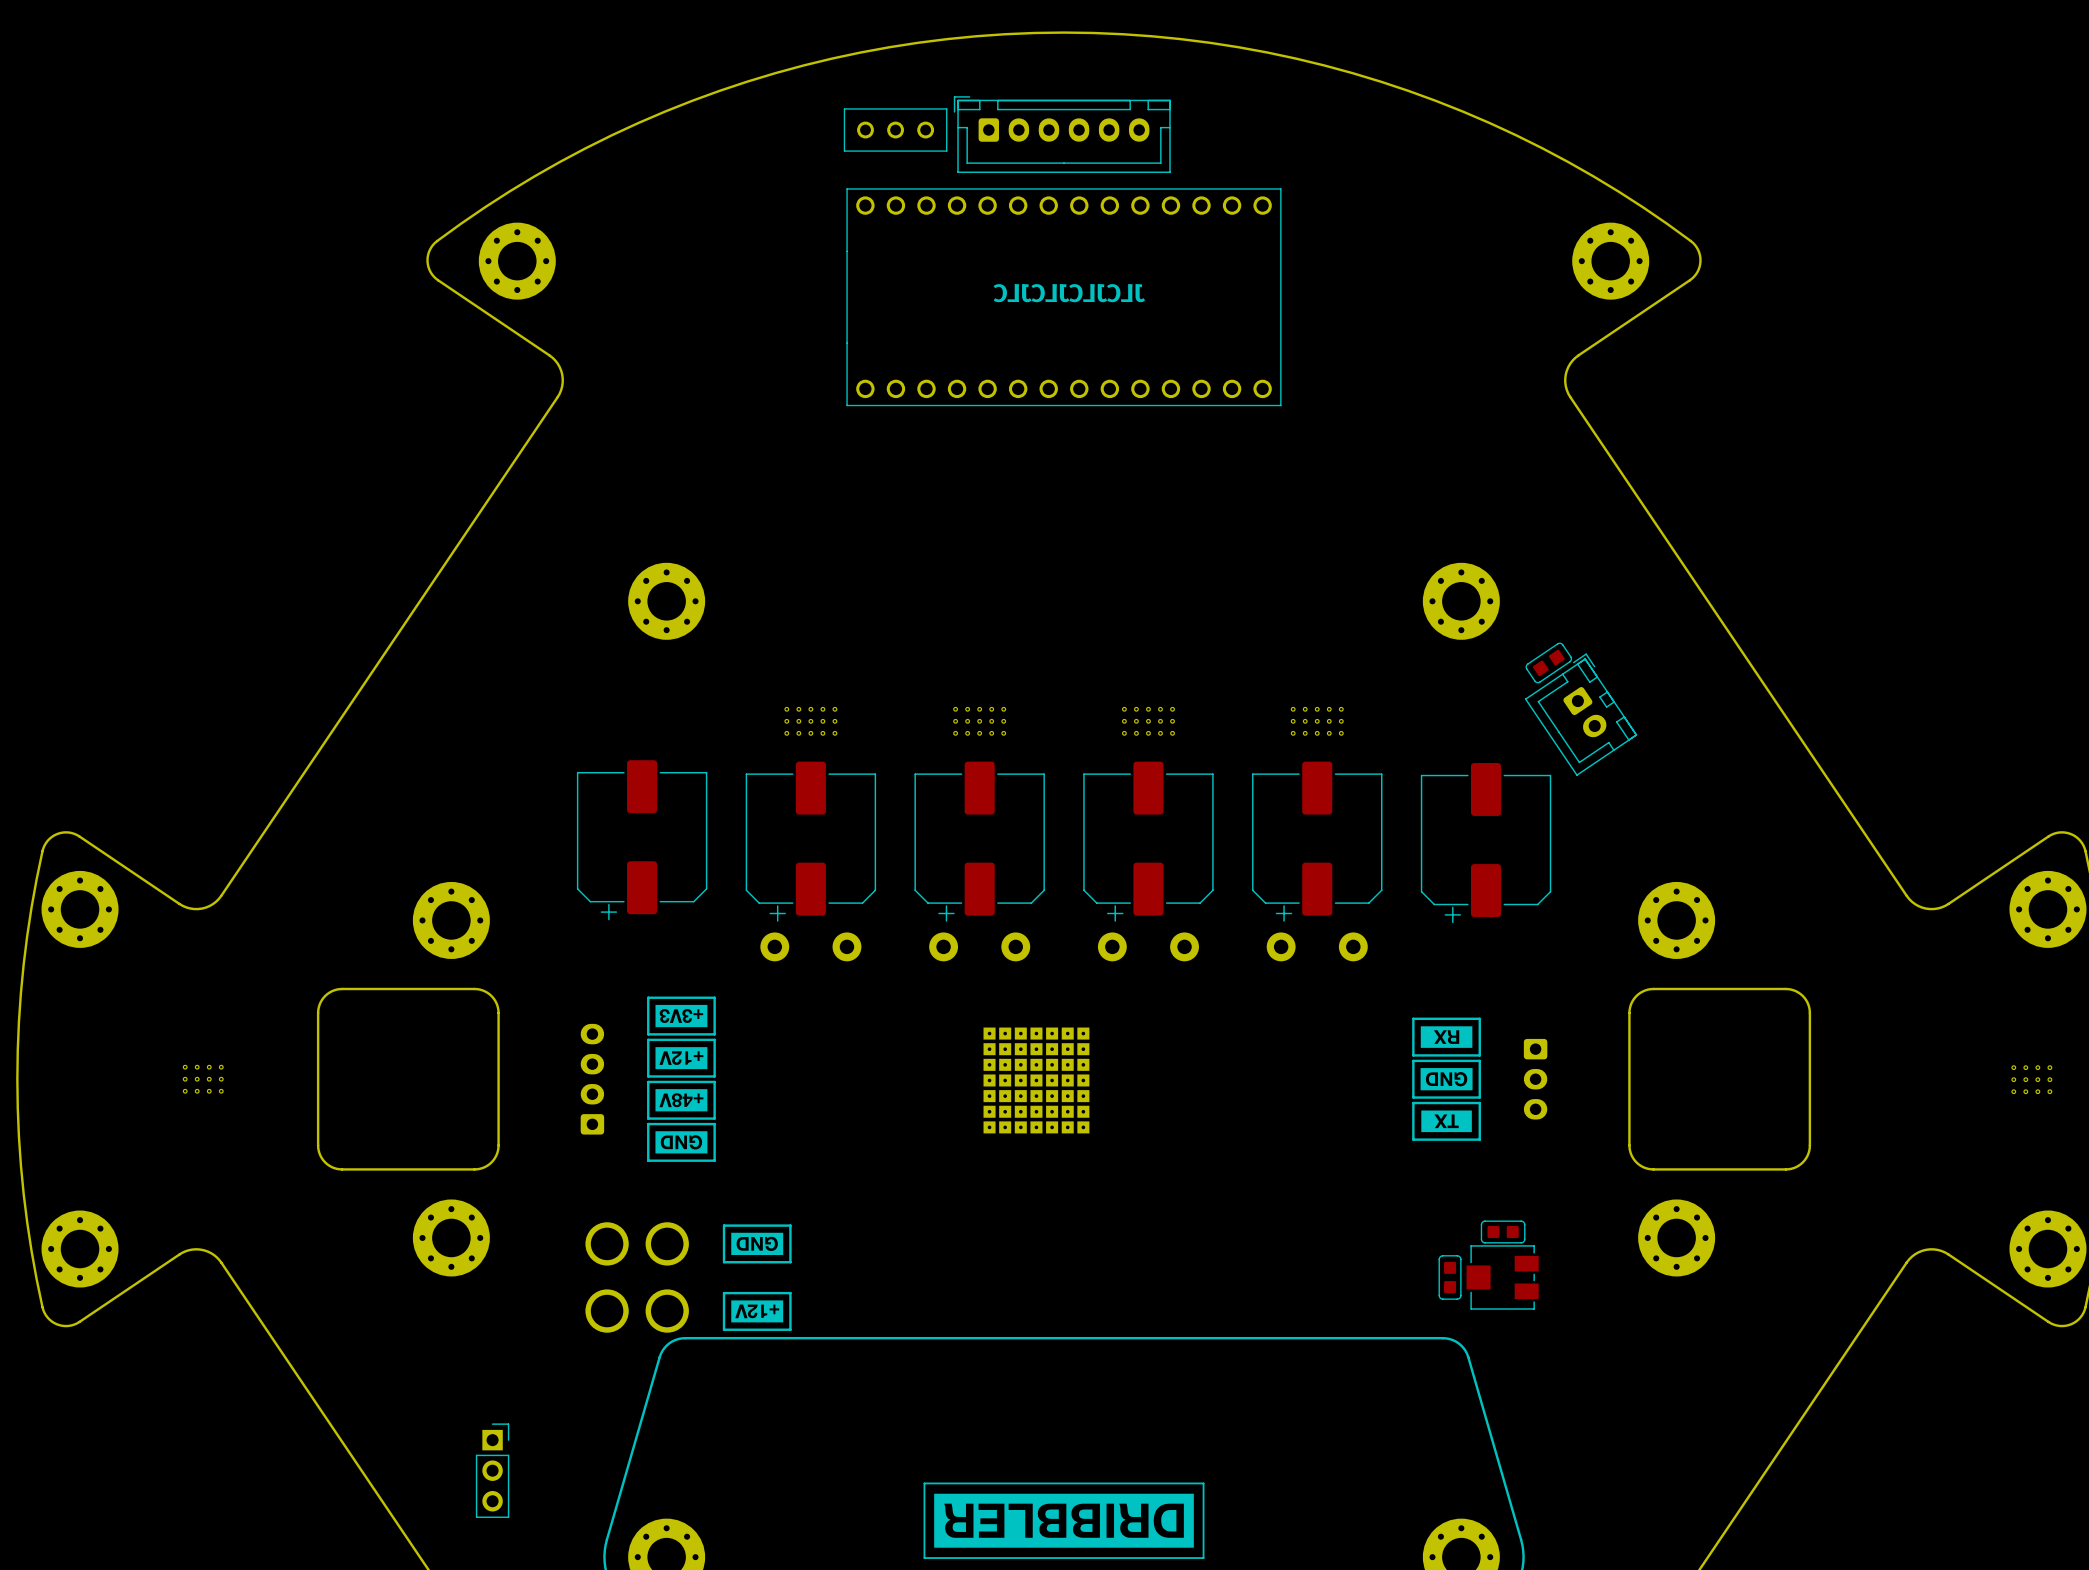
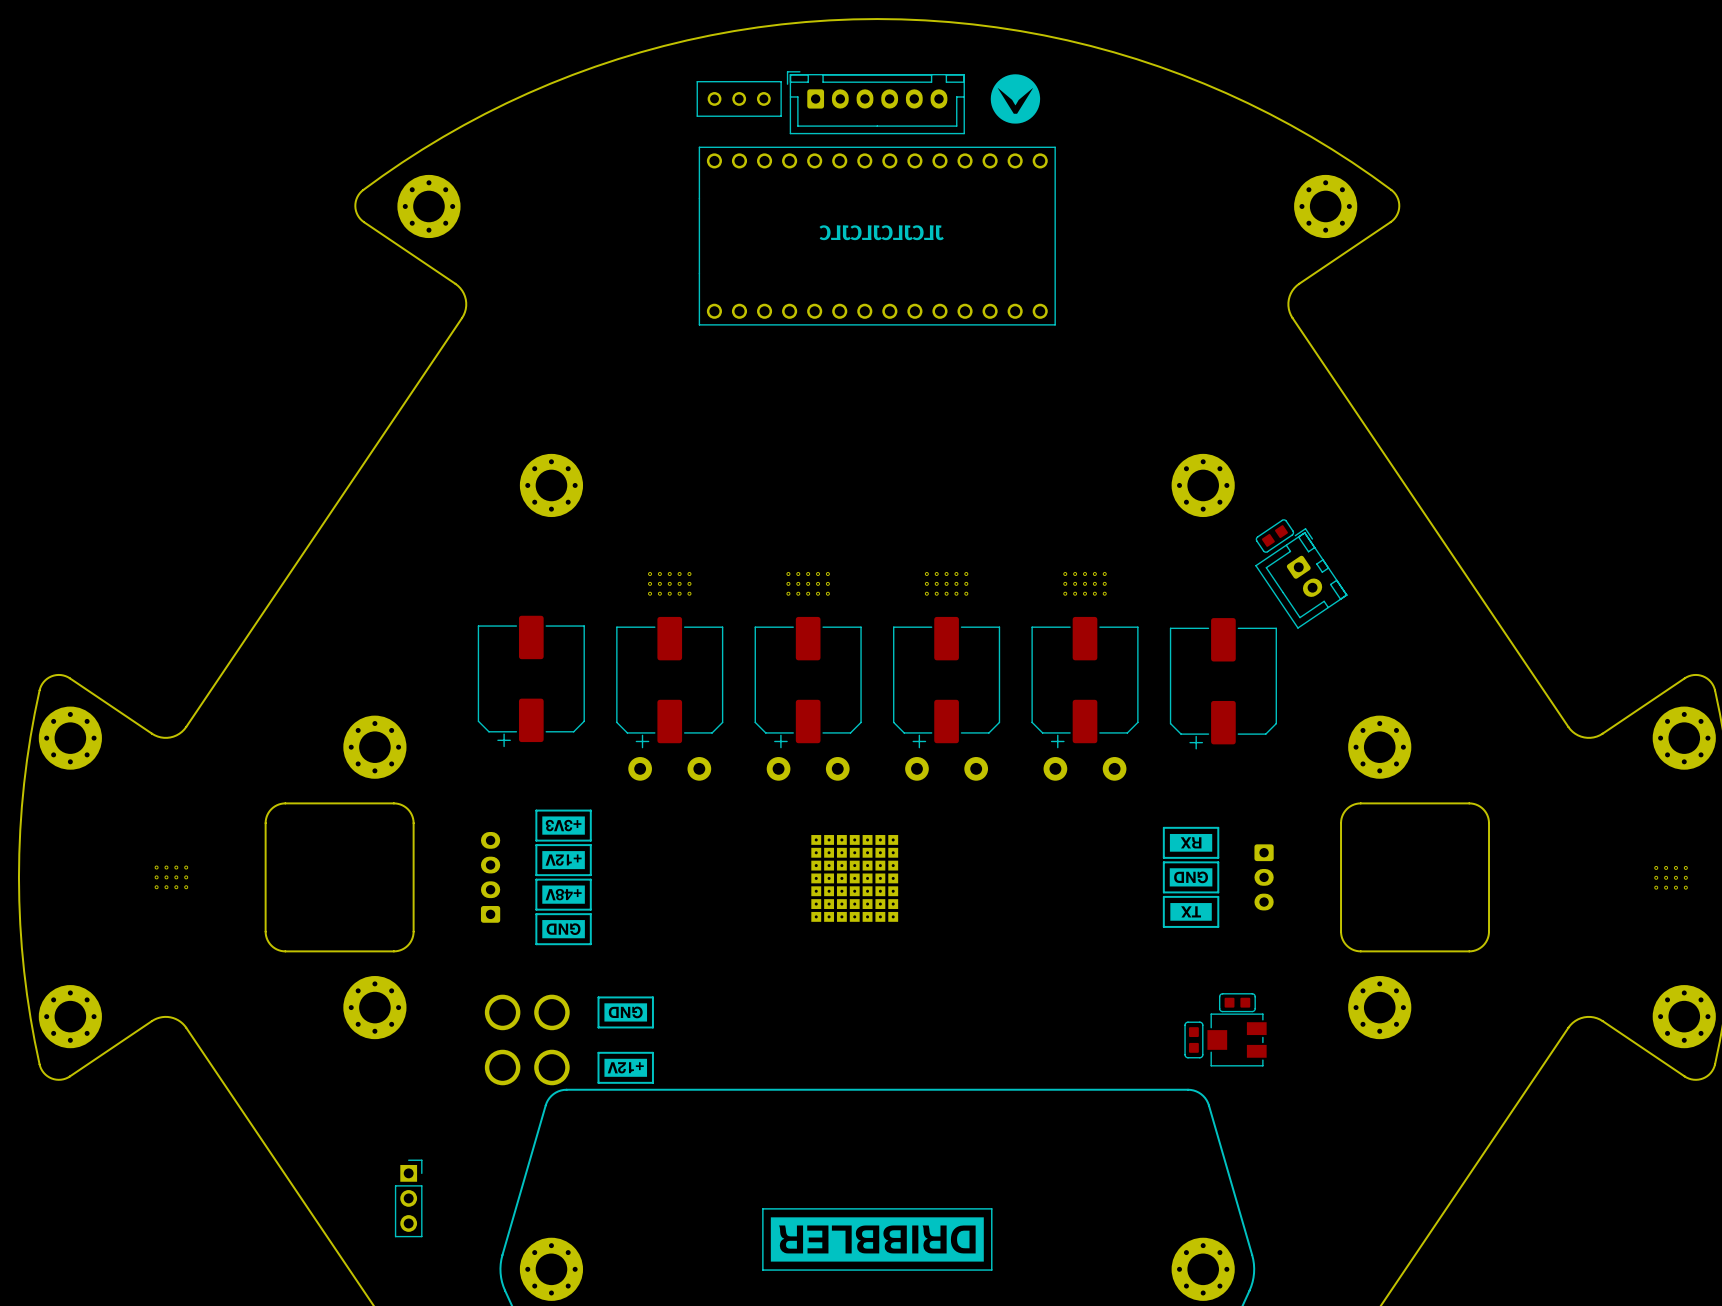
drawing: none -> [990, 74, 1041, 124]

